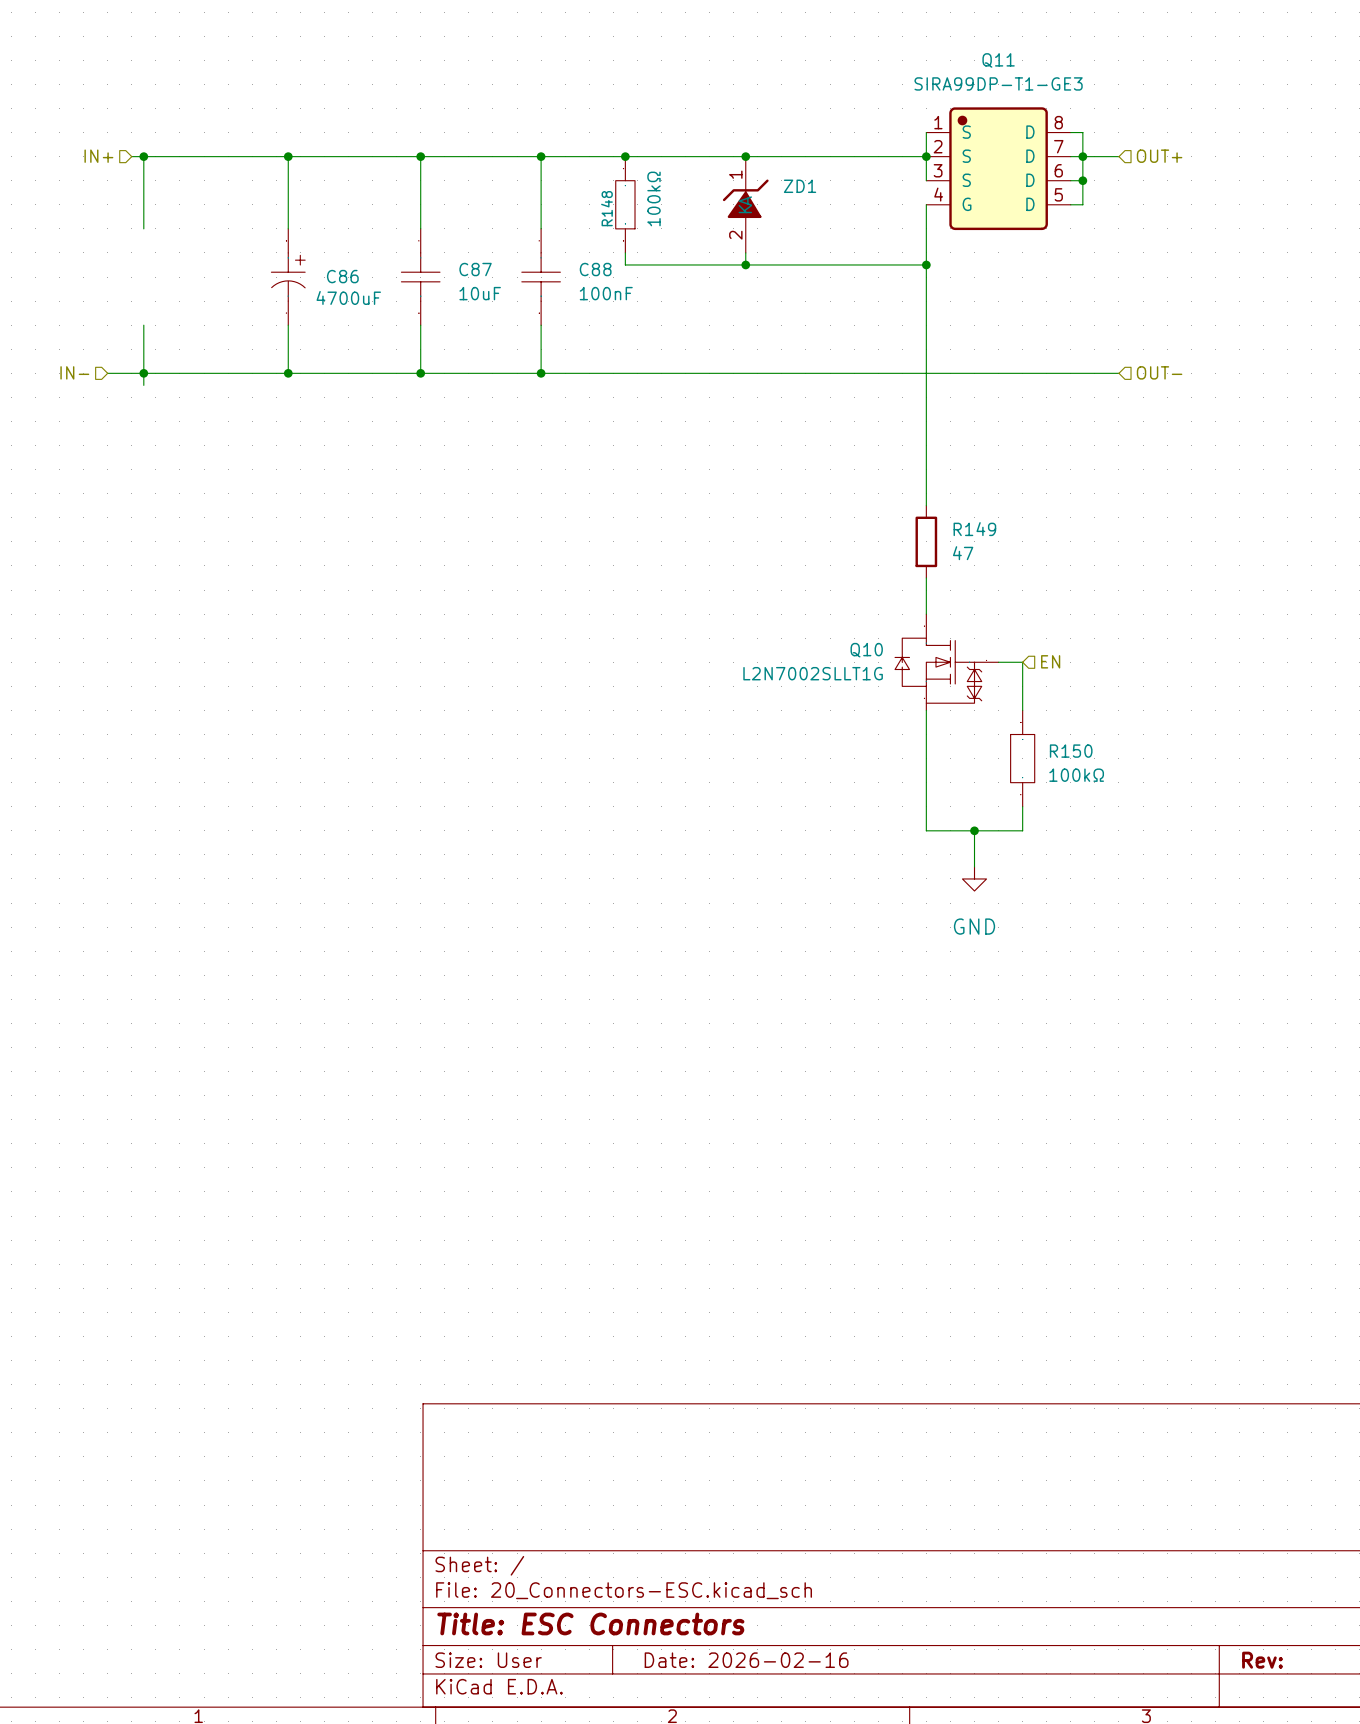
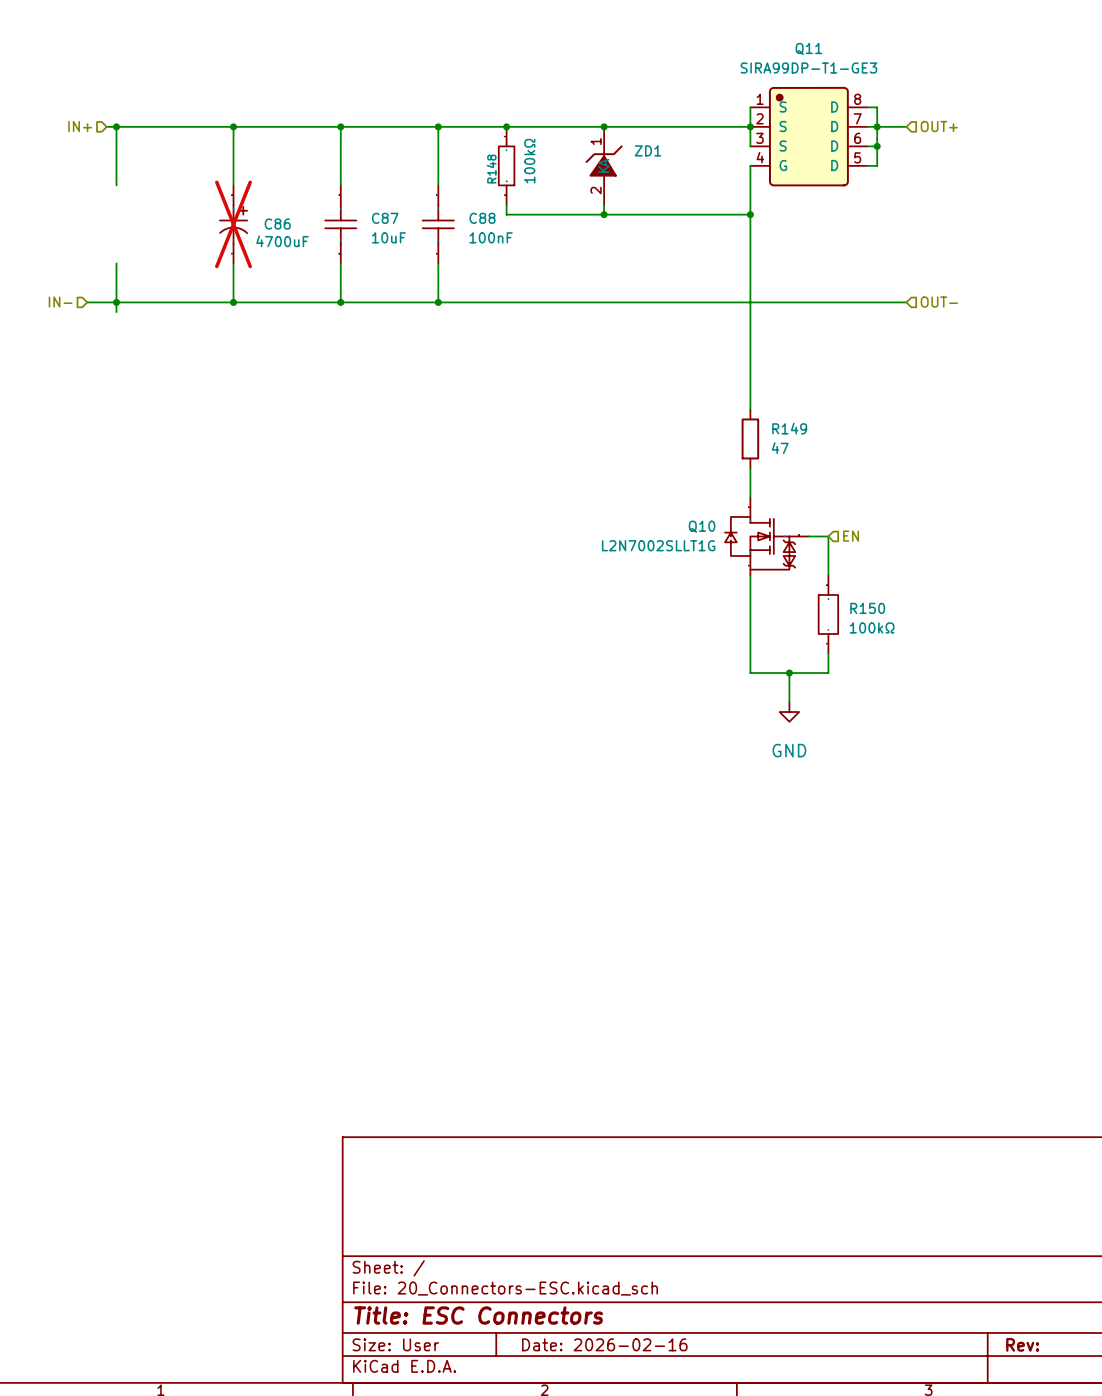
C86 do-not-place cross: none -> (233, 224)

